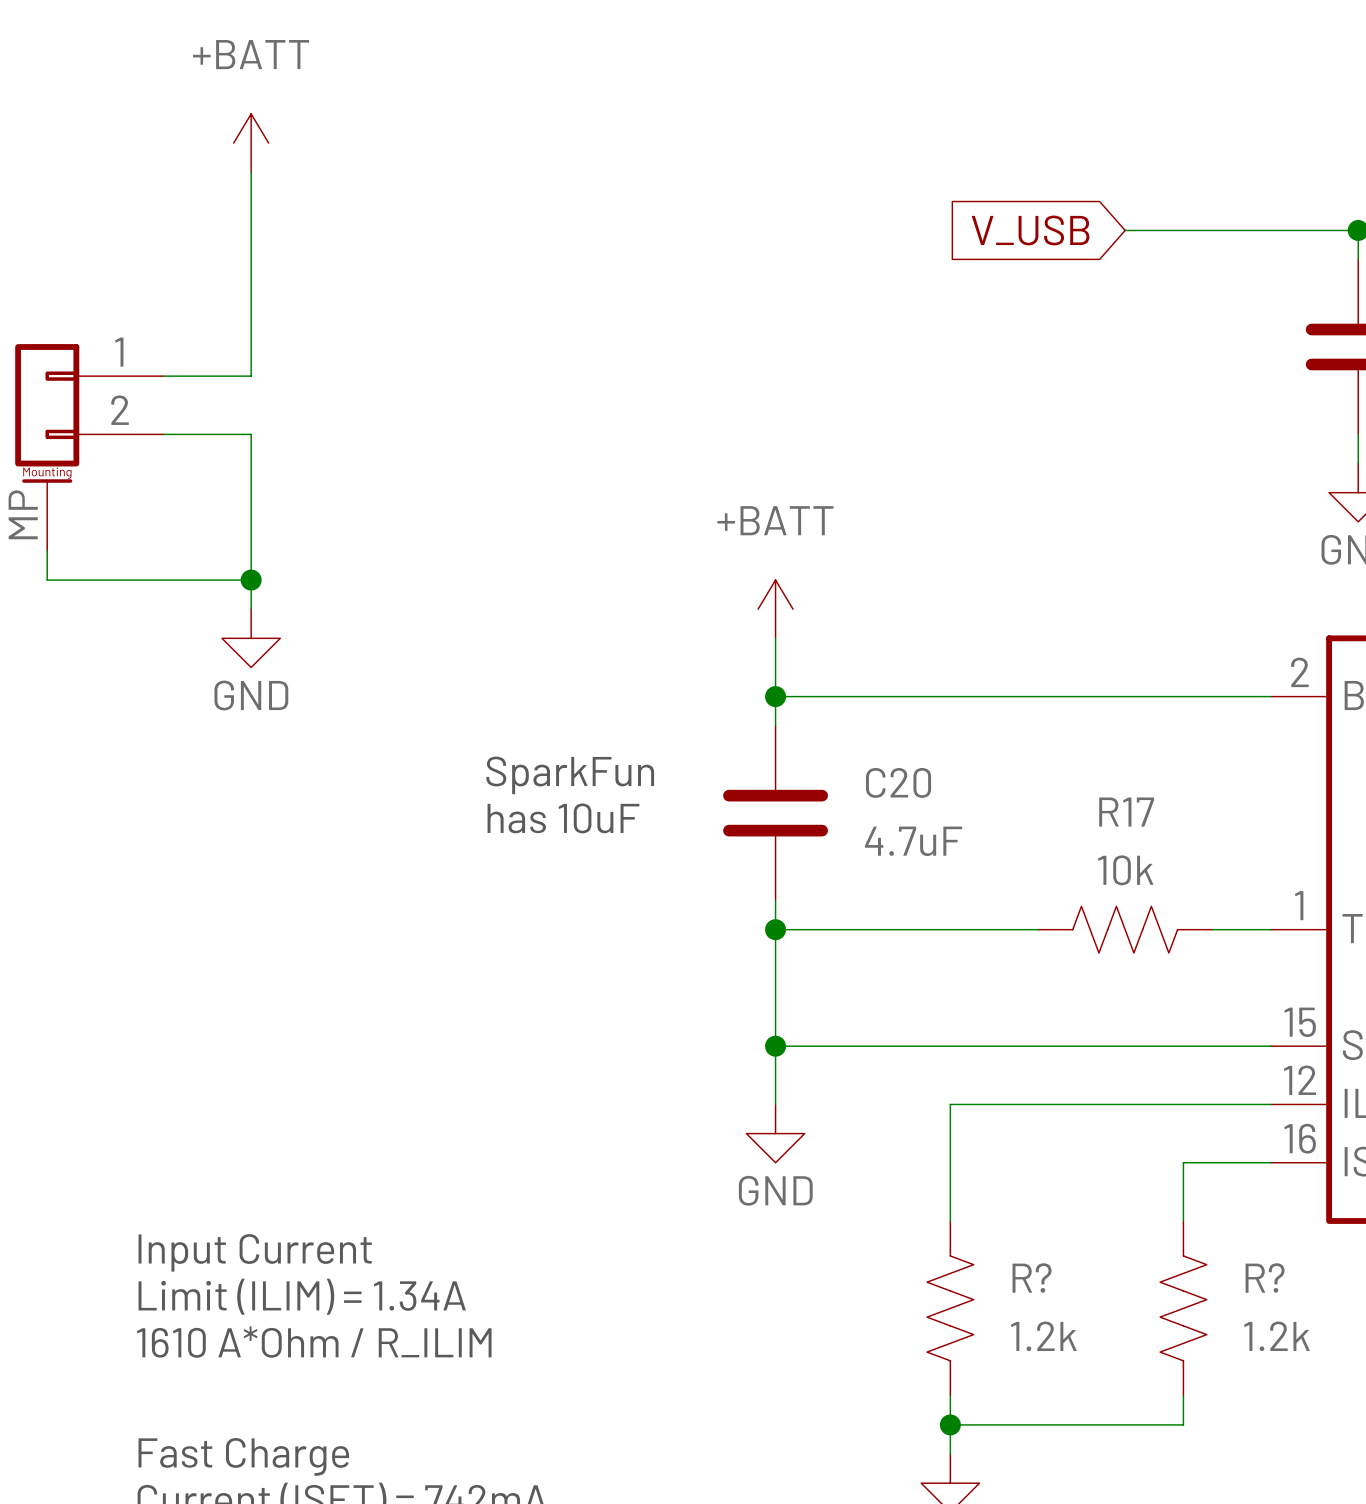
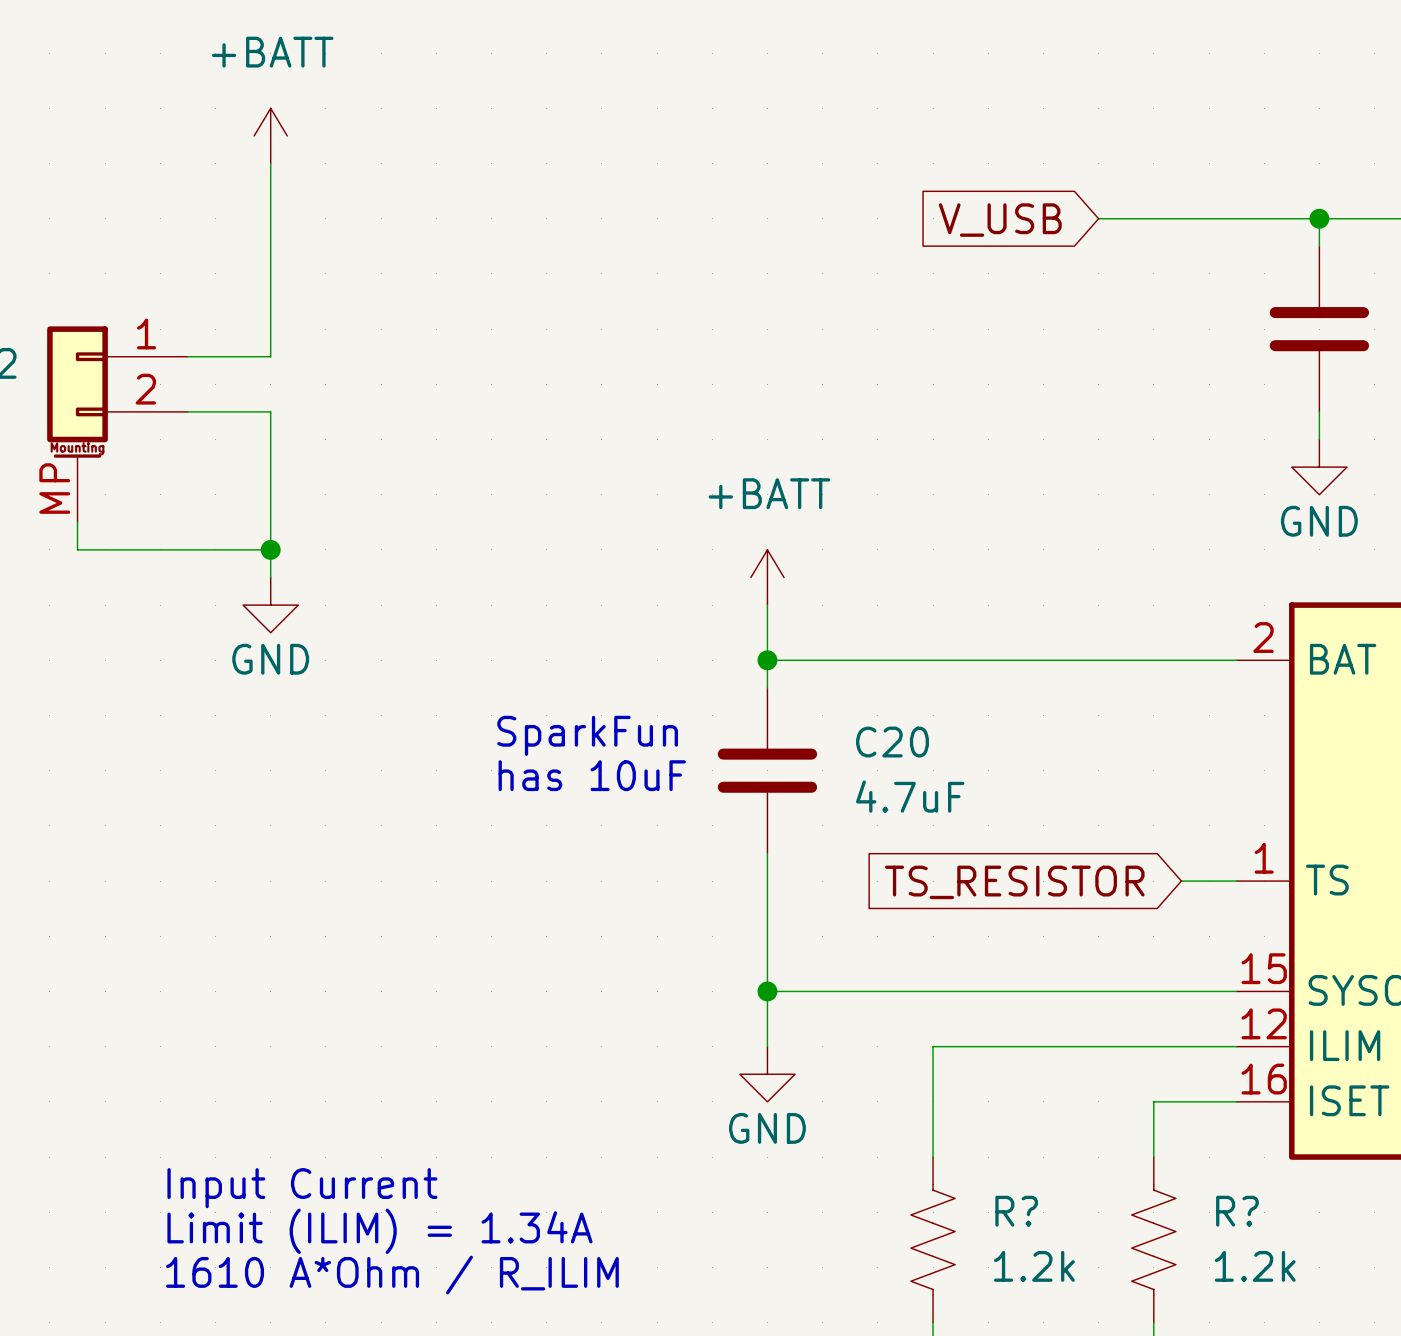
wire: (775, 929) (1037, 929) -> none
junction: (775, 929) -> none
global label: none -> TS_RESISTOR (1014, 882)
R17: 10k (1125, 929) -> none

